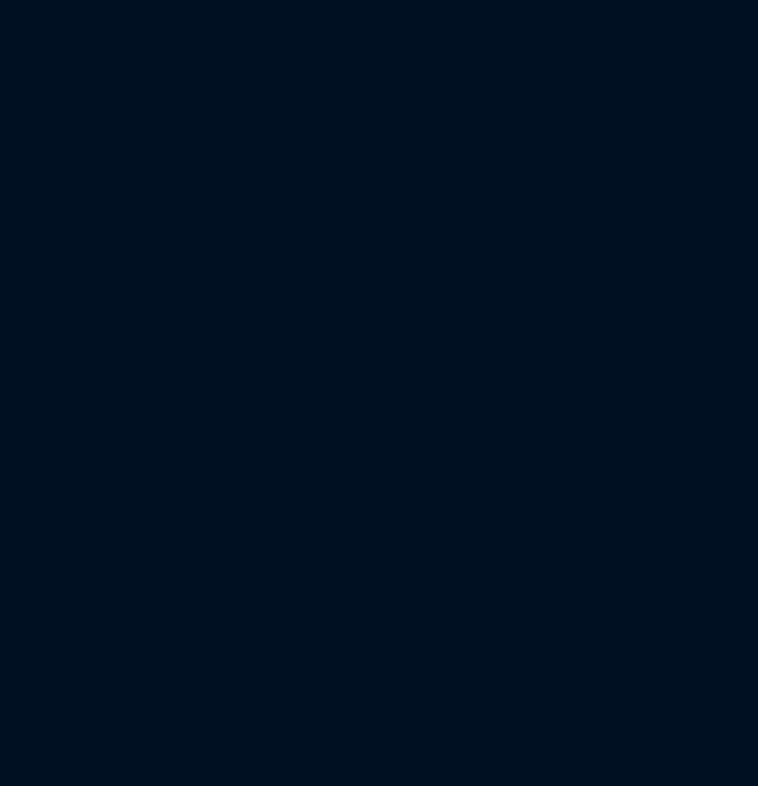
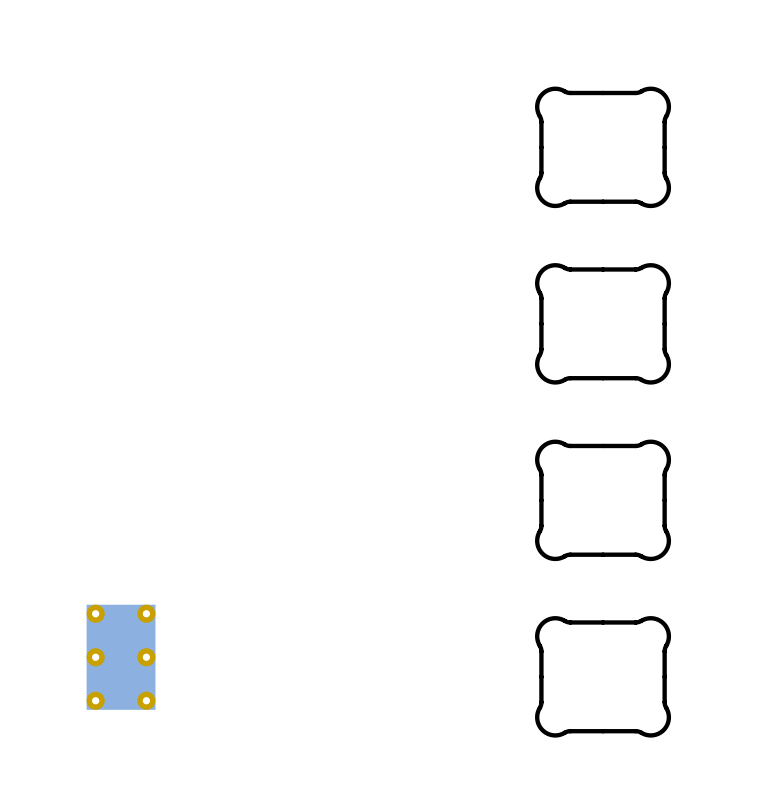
part: none -> (603, 147)
part: none -> (603, 323)
part: none -> (603, 500)
part: none -> (121, 657)
part: none -> (603, 676)

